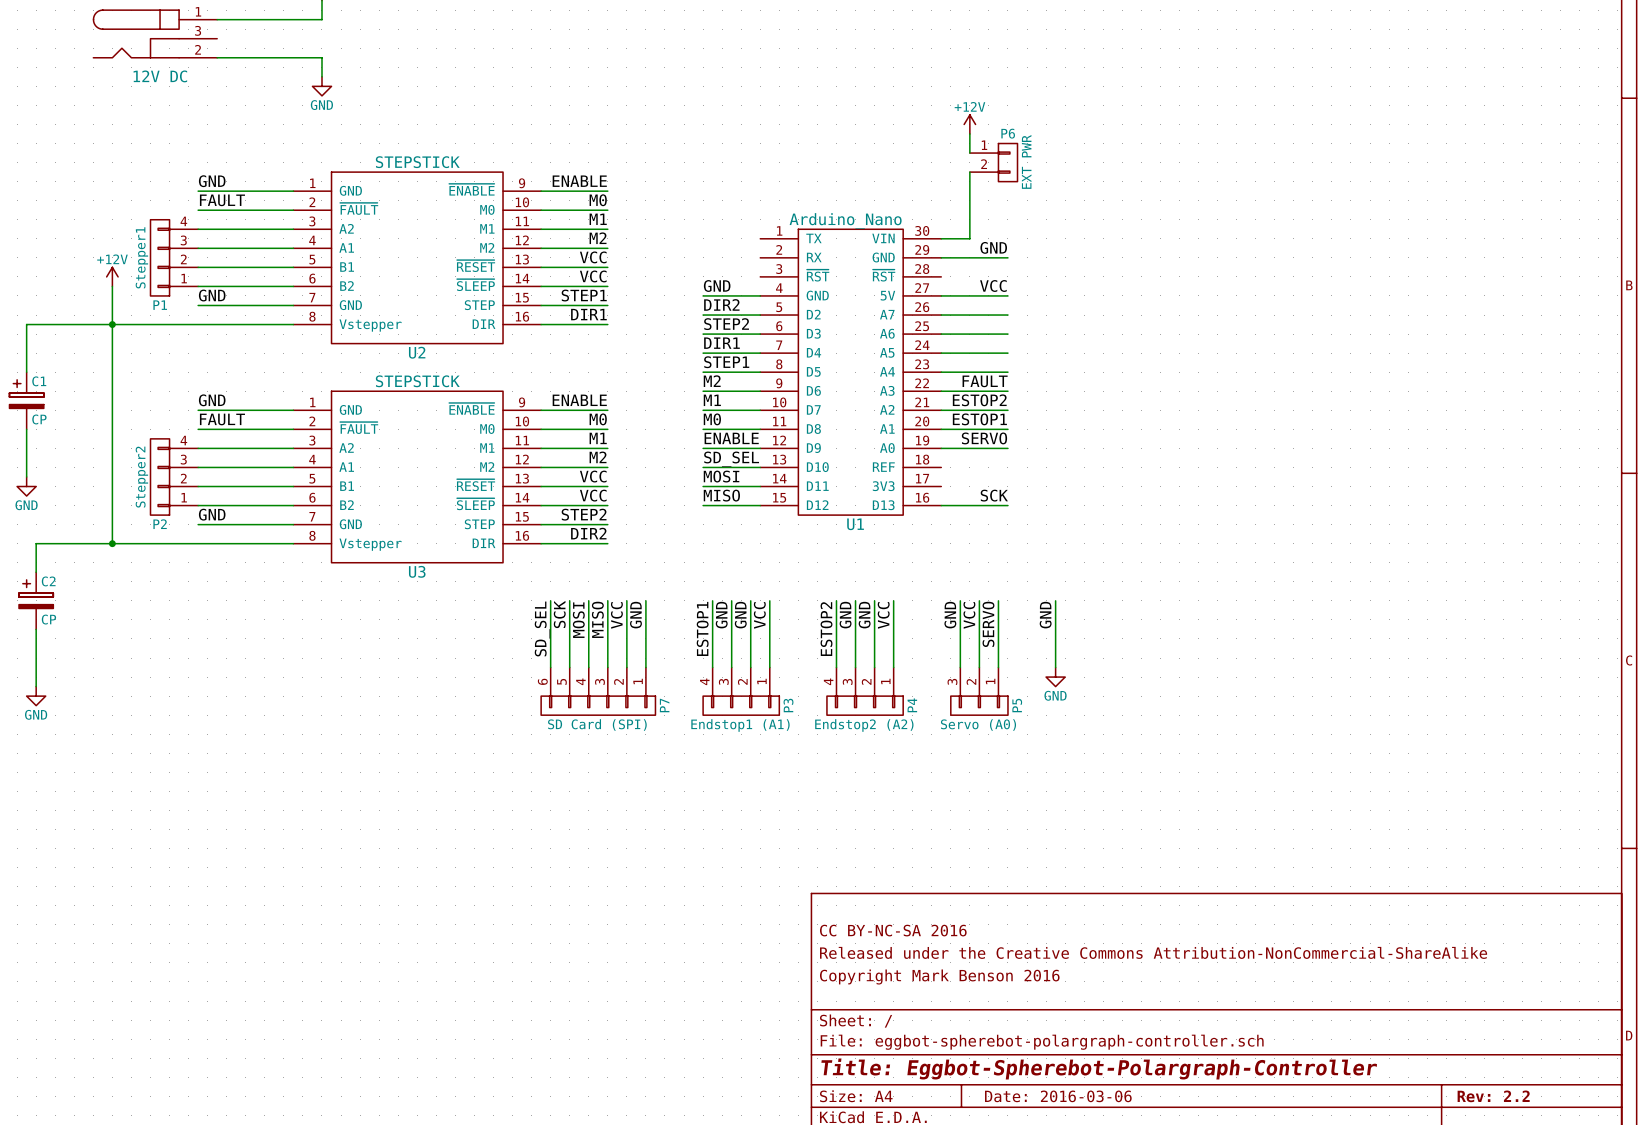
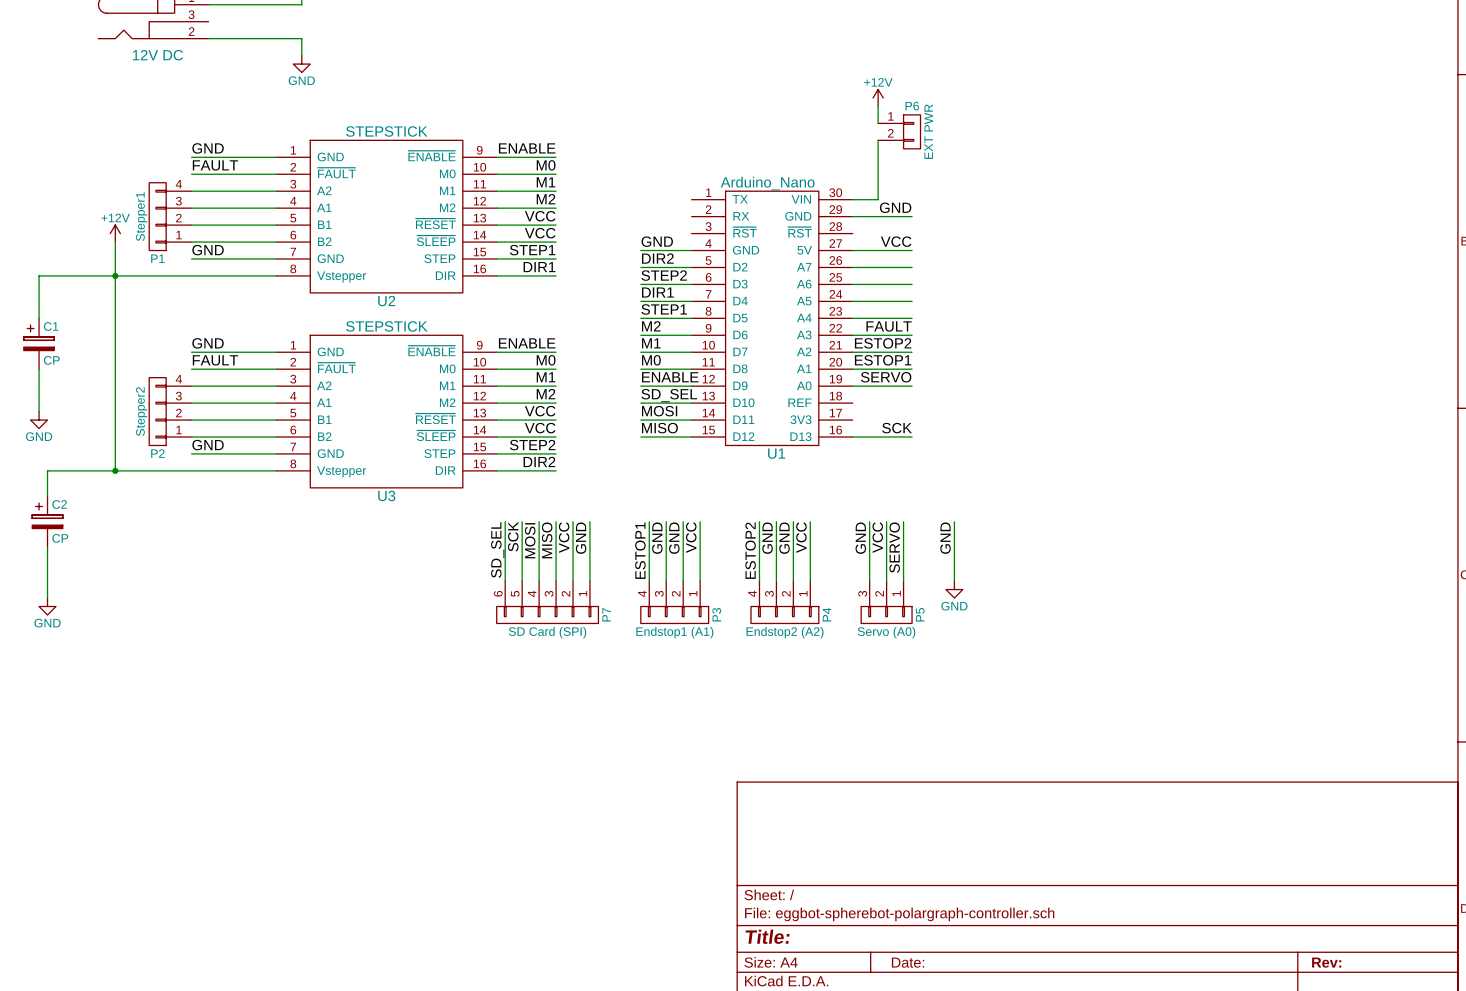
title block: CC BY-NC-SA 2016 (893, 930) -> none
title block: Released under the Creative Commons Attribution-NonCommercial-ShareAlike (1153, 952) -> none
title block: Copyright Mark Benson 2016 (939, 976) -> none
title block: Title: Eggbot-Spherebot-Polargraph-Controller (1099, 1068) -> Title: (767, 936)
title block: Date: 2016-03-06 (1058, 1096) -> Date: (908, 962)
title block: Rev: 2.2 (1493, 1096) -> Rev: (1326, 962)

